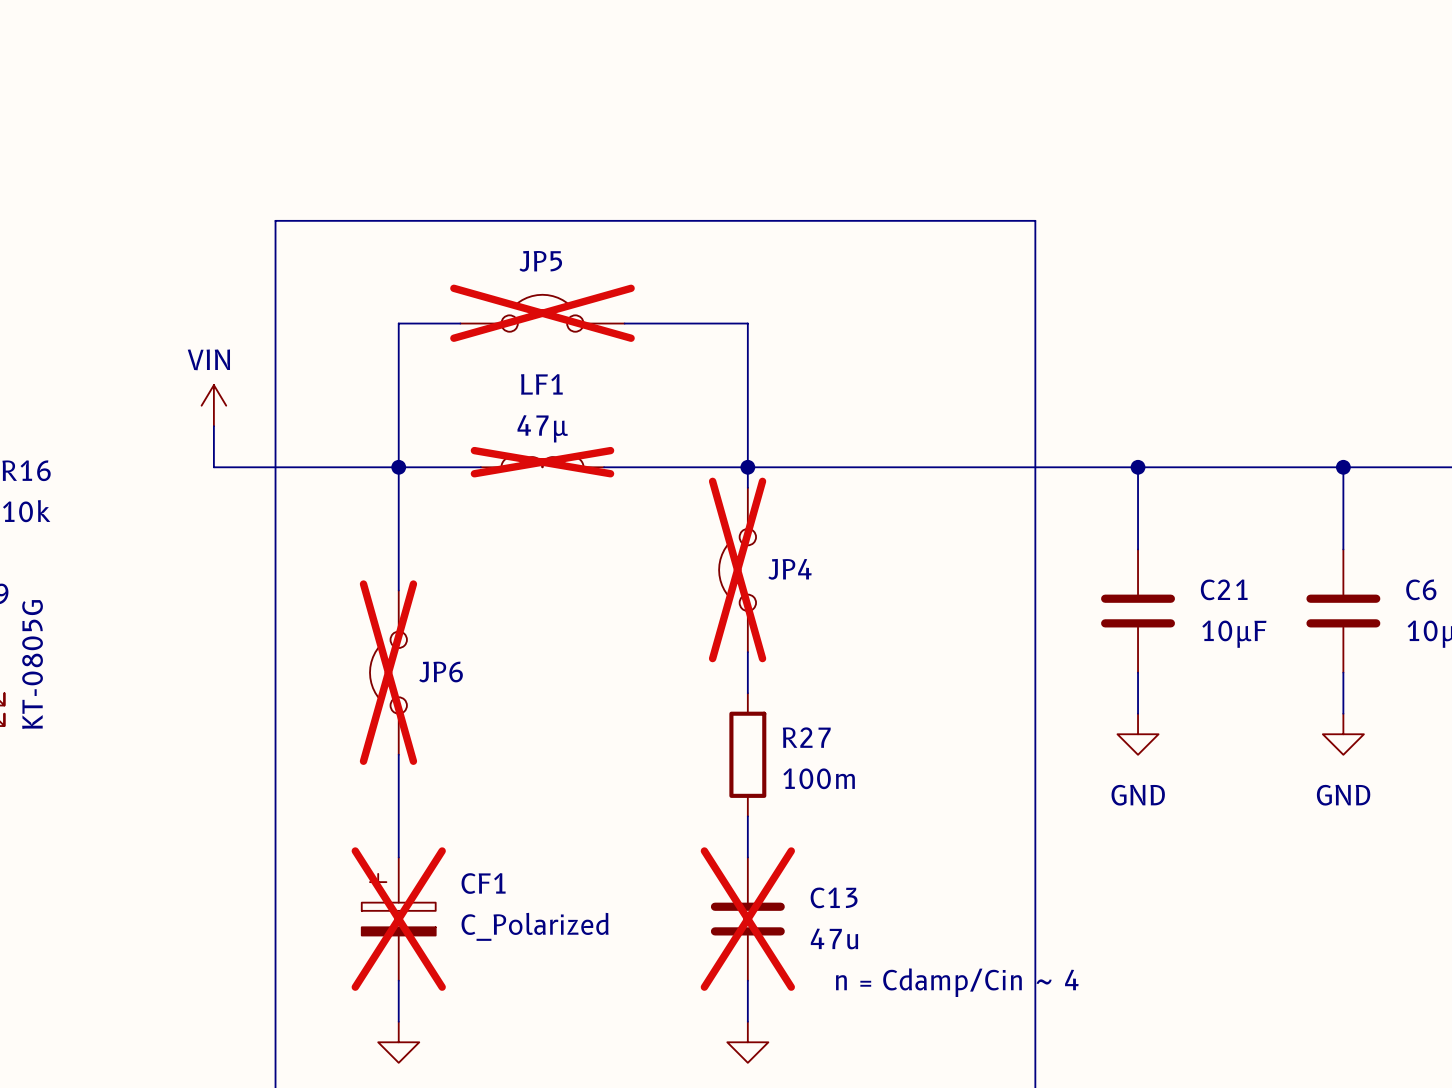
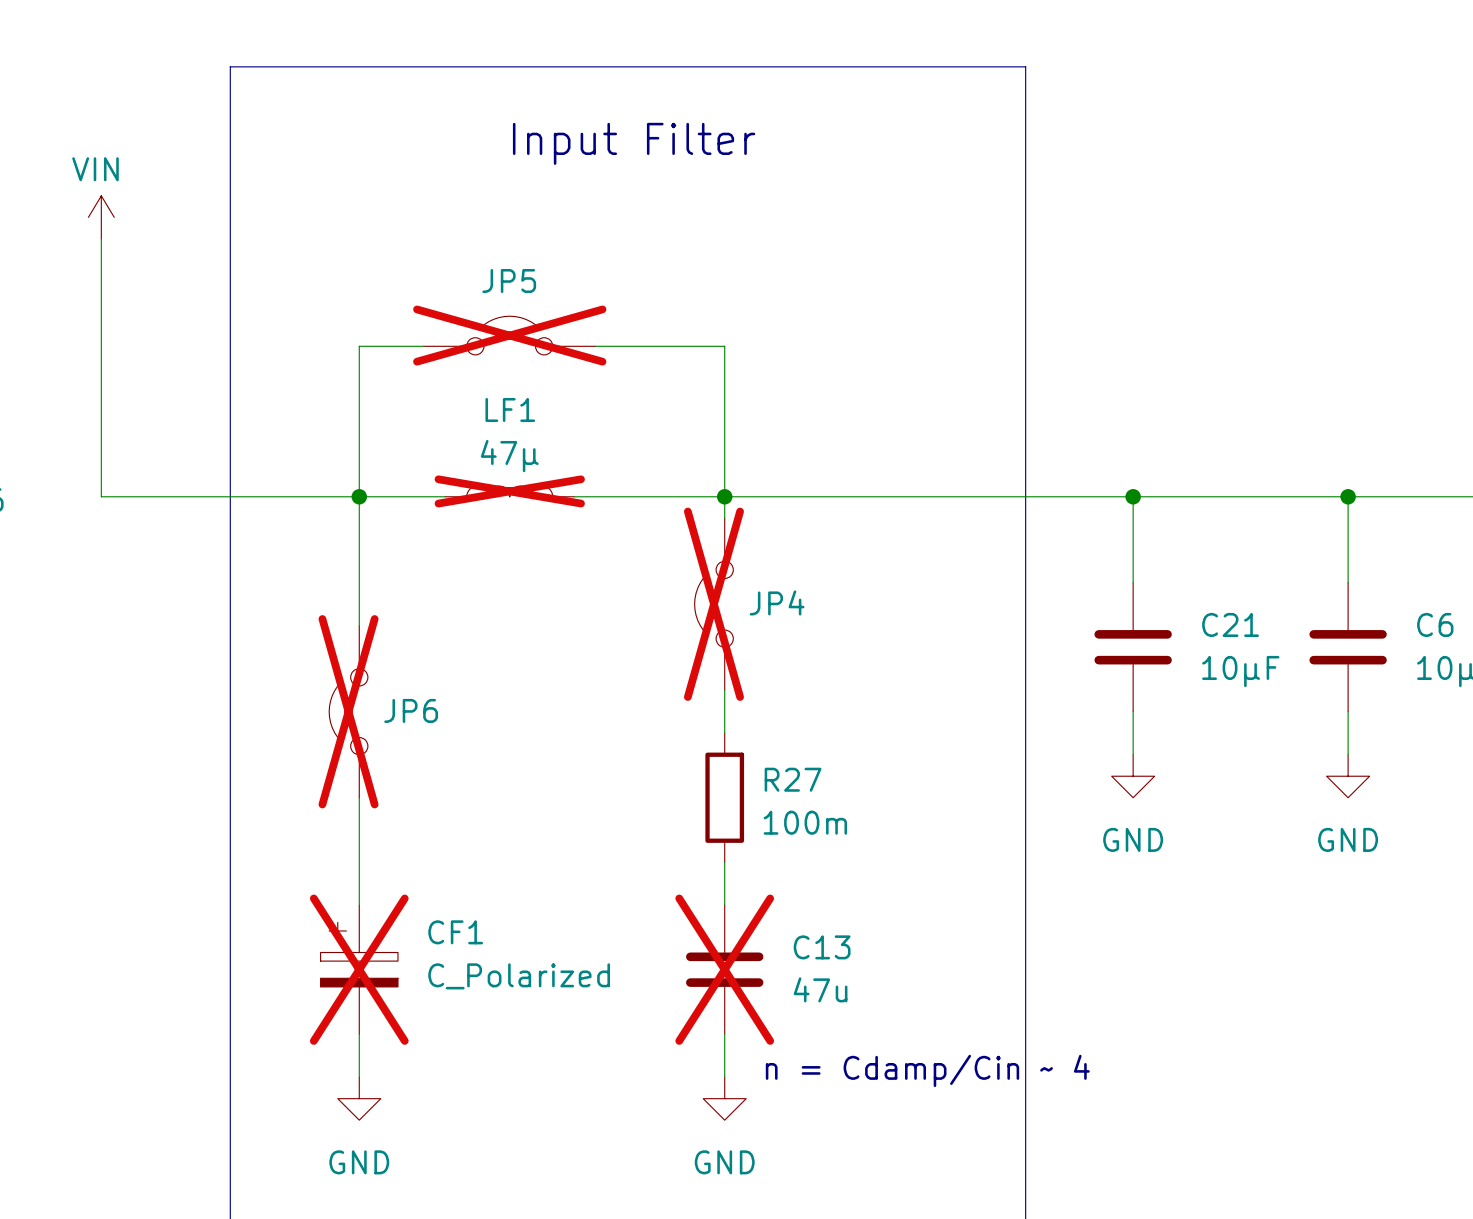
text: none -> Input Filter (634, 143)
line: (275, 220) (1035, 220) -> (230, 238) (230, 66) (1025, 66) (1025, 238)
power symbol position: VIN (213, 405) -> VIN (101, 217)
wire: (213, 426) (213, 467) -> (101, 238) (101, 496) (165, 496)
text position: n = Cdamp/Cin ~ 4 (957, 982) -> n = Cdamp/Cin ~ 4 (927, 1070)

